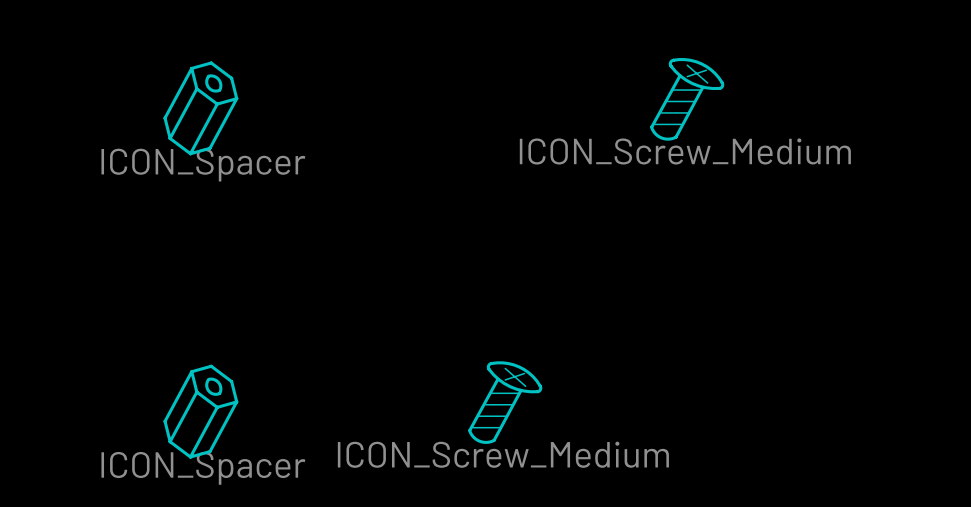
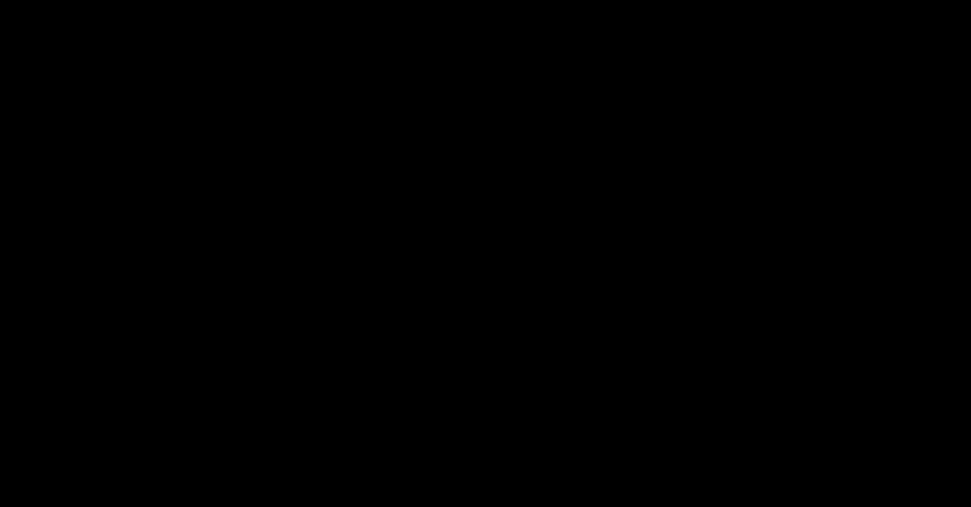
drawing: [650, 58, 725, 141] -> none
drawing: [163, 61, 239, 156] -> none
drawing: [163, 361, 543, 459] -> none

